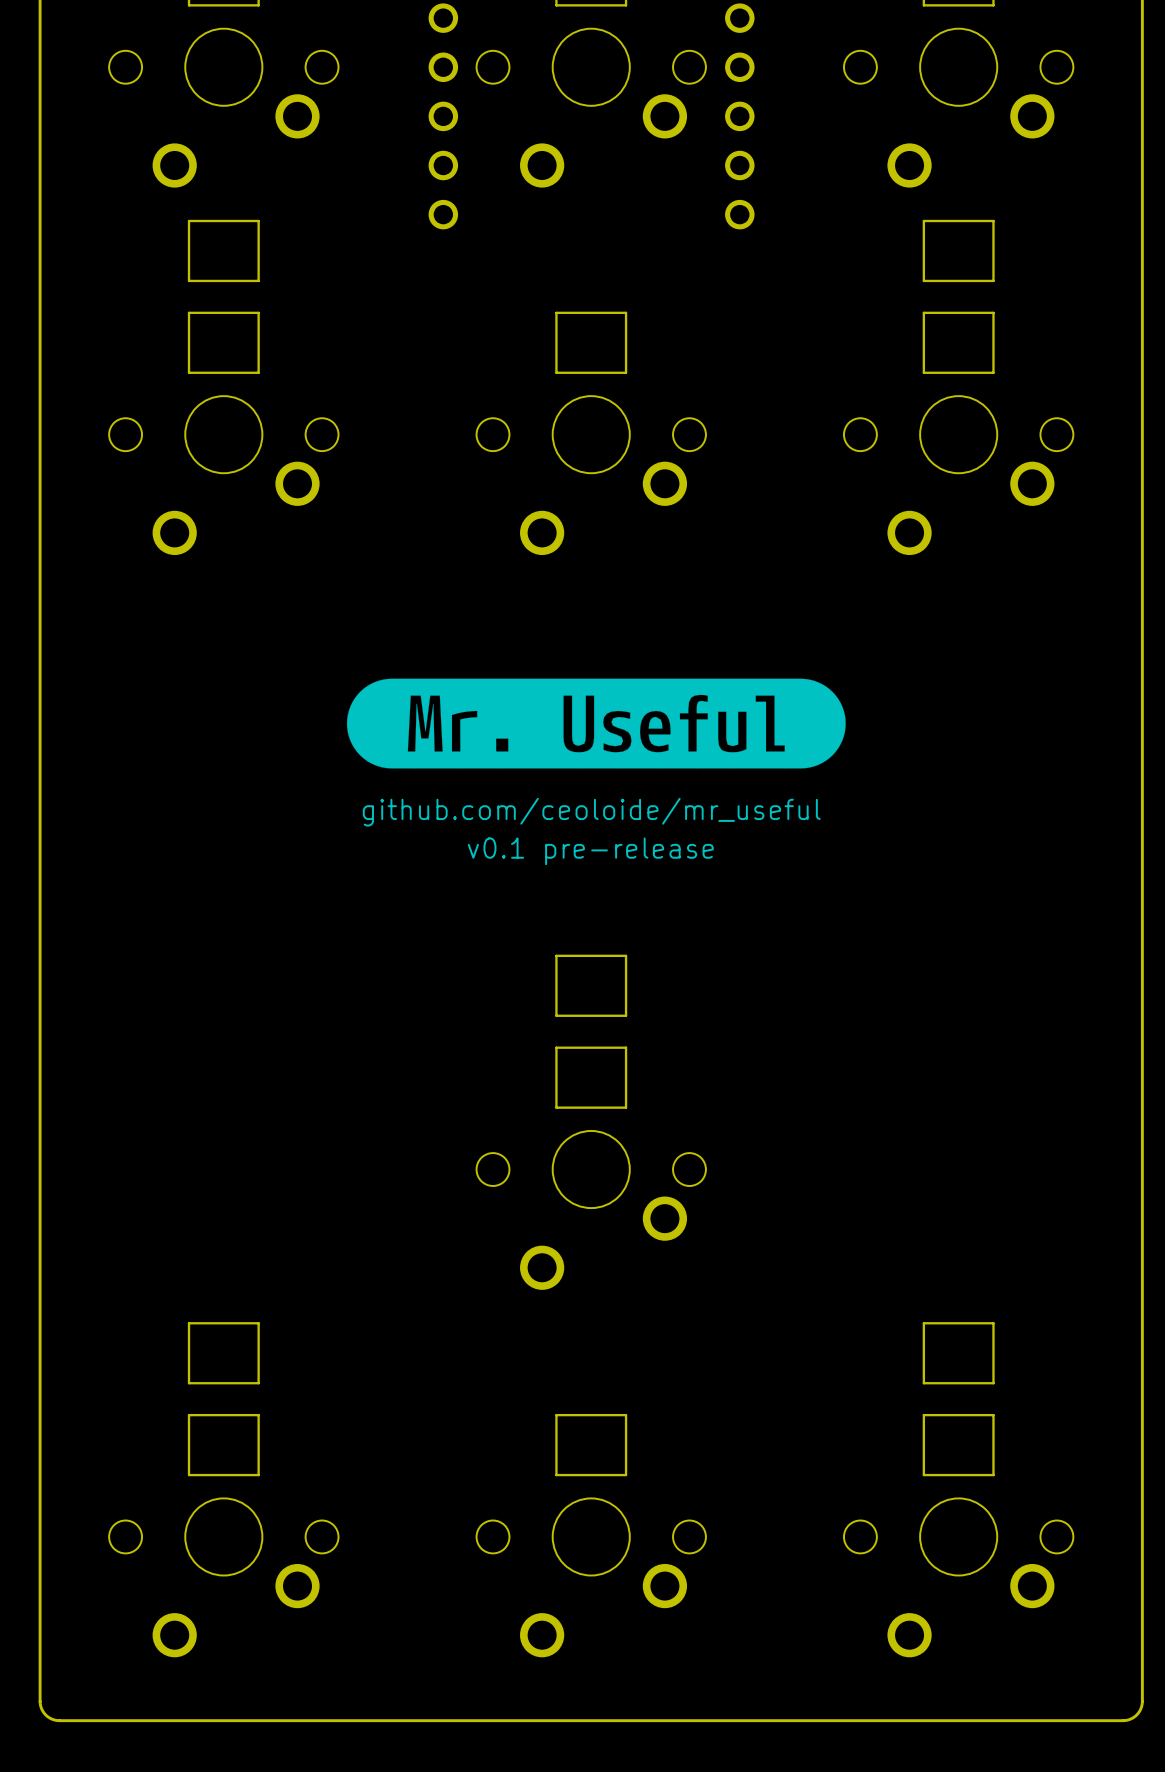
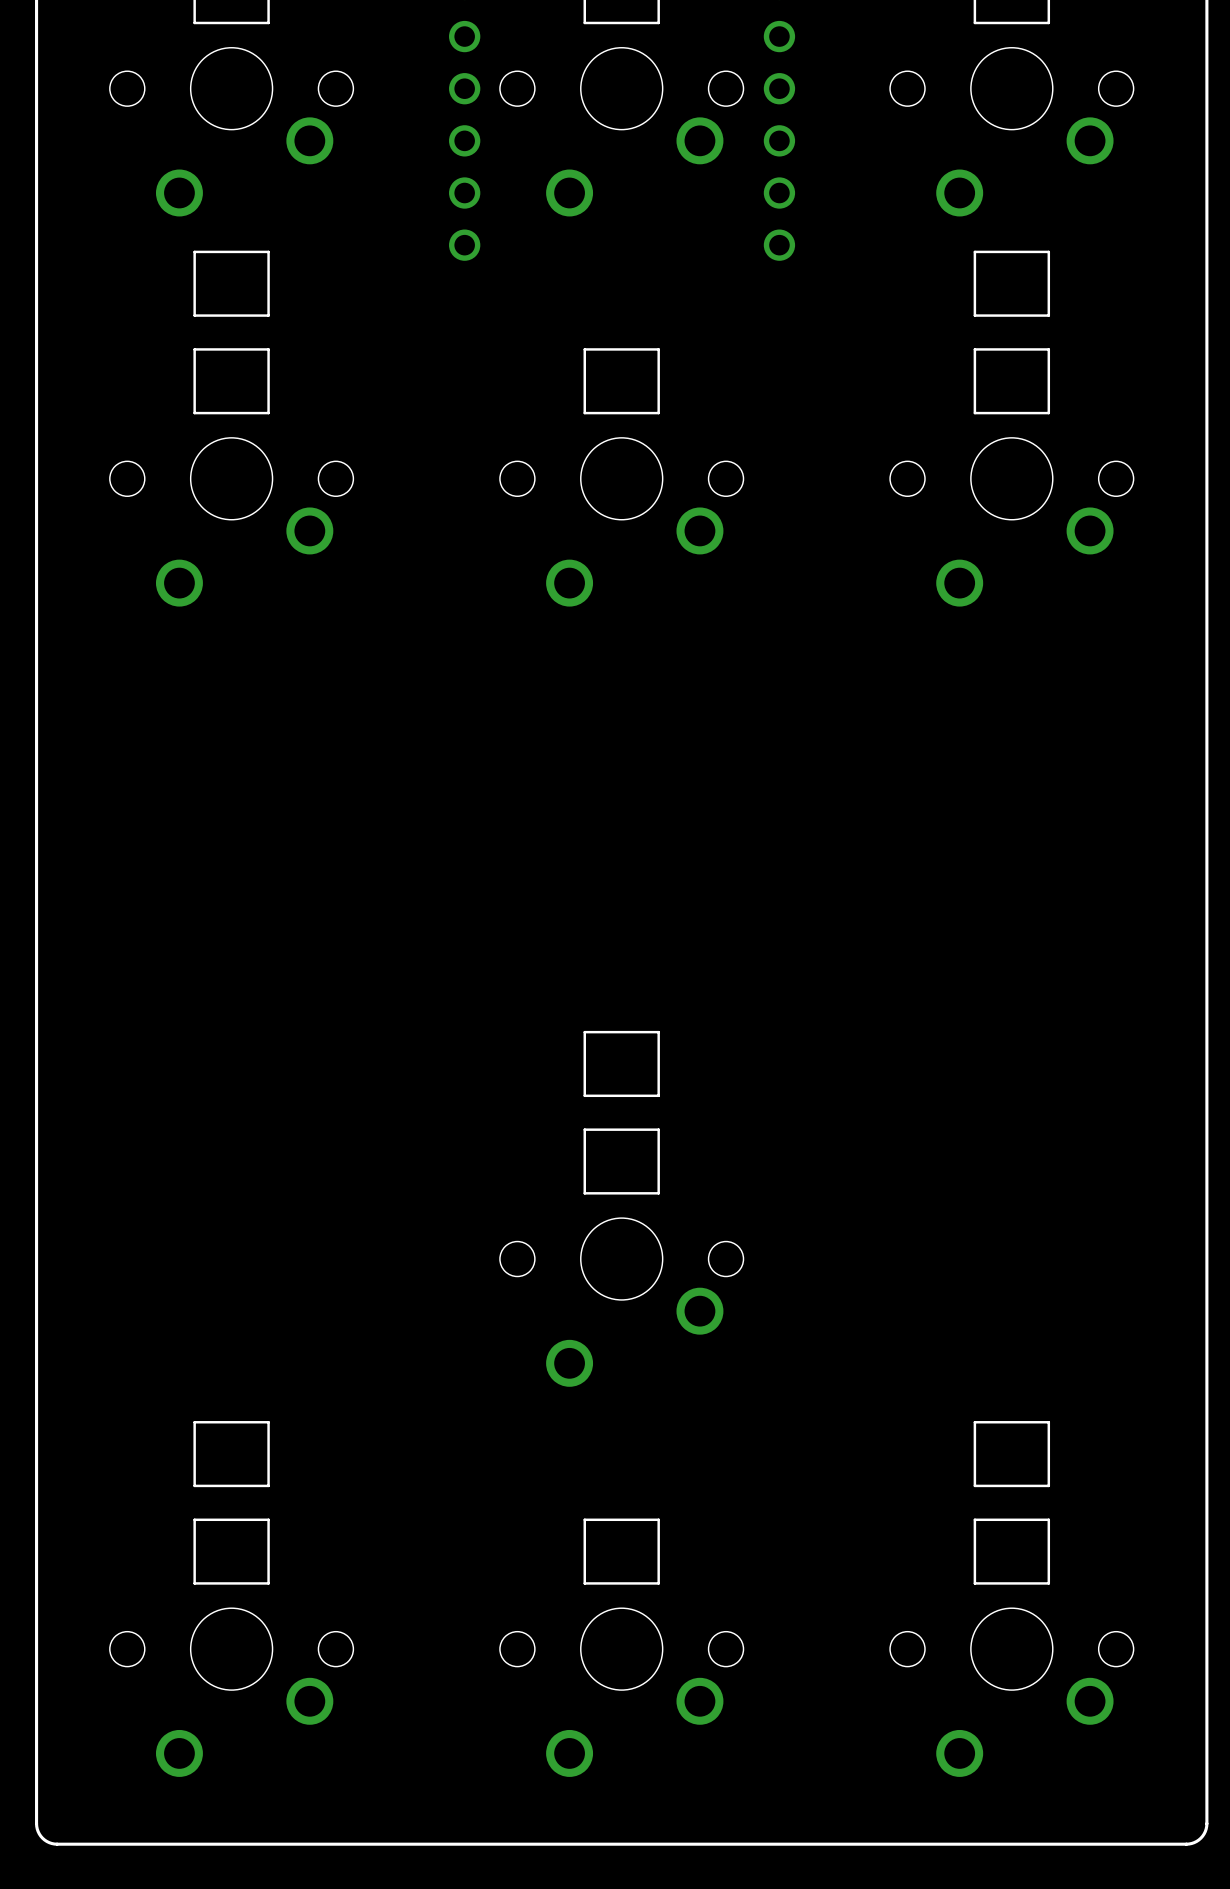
drawing: [346, 678, 846, 769] -> none

